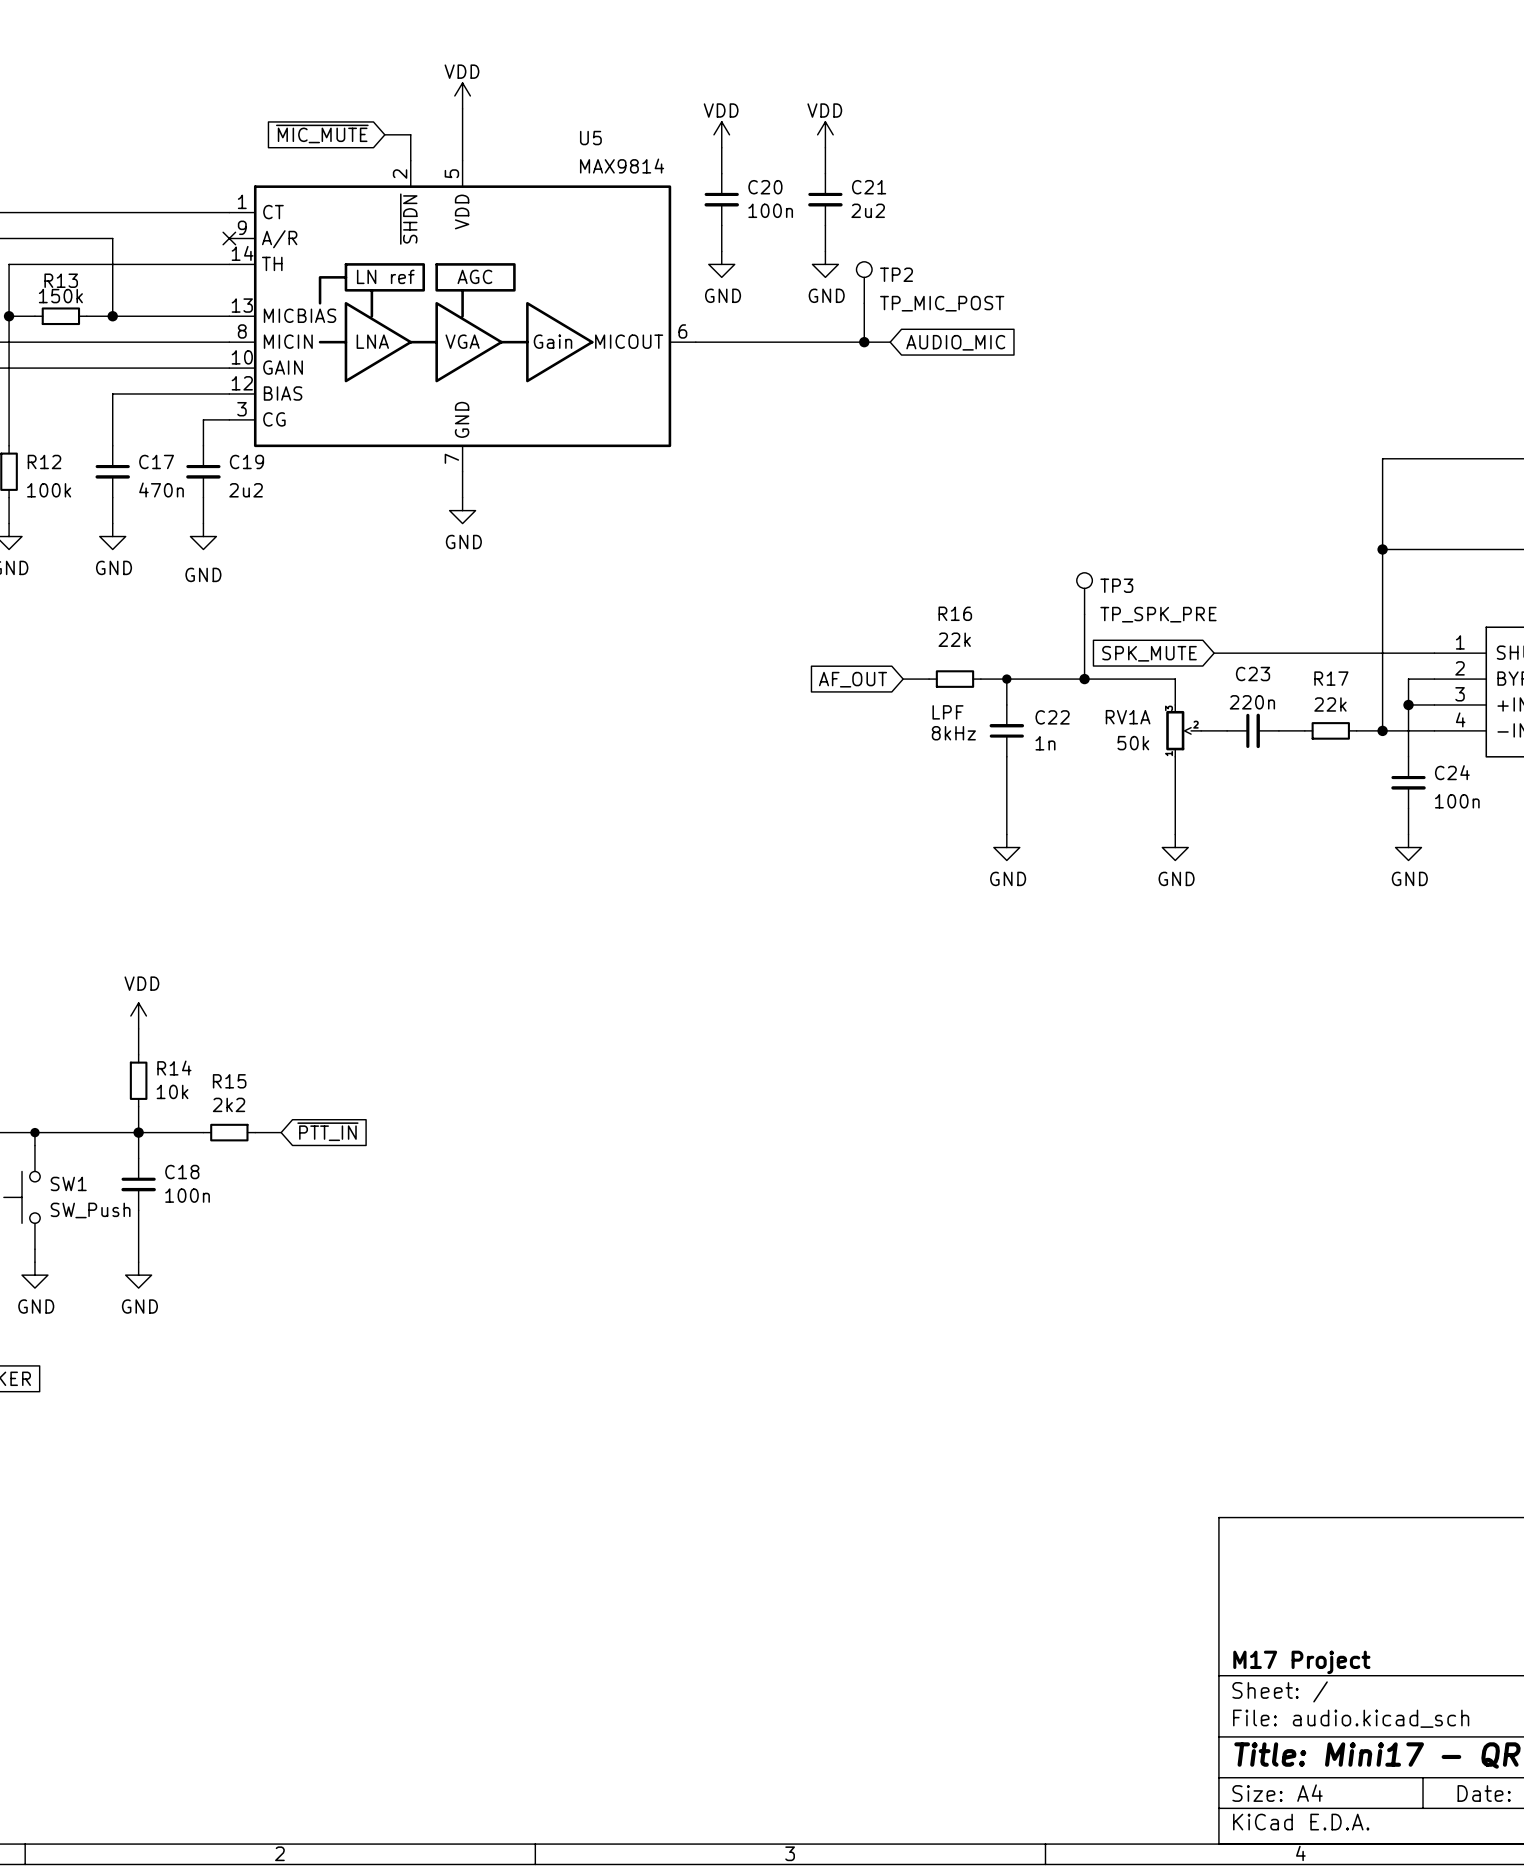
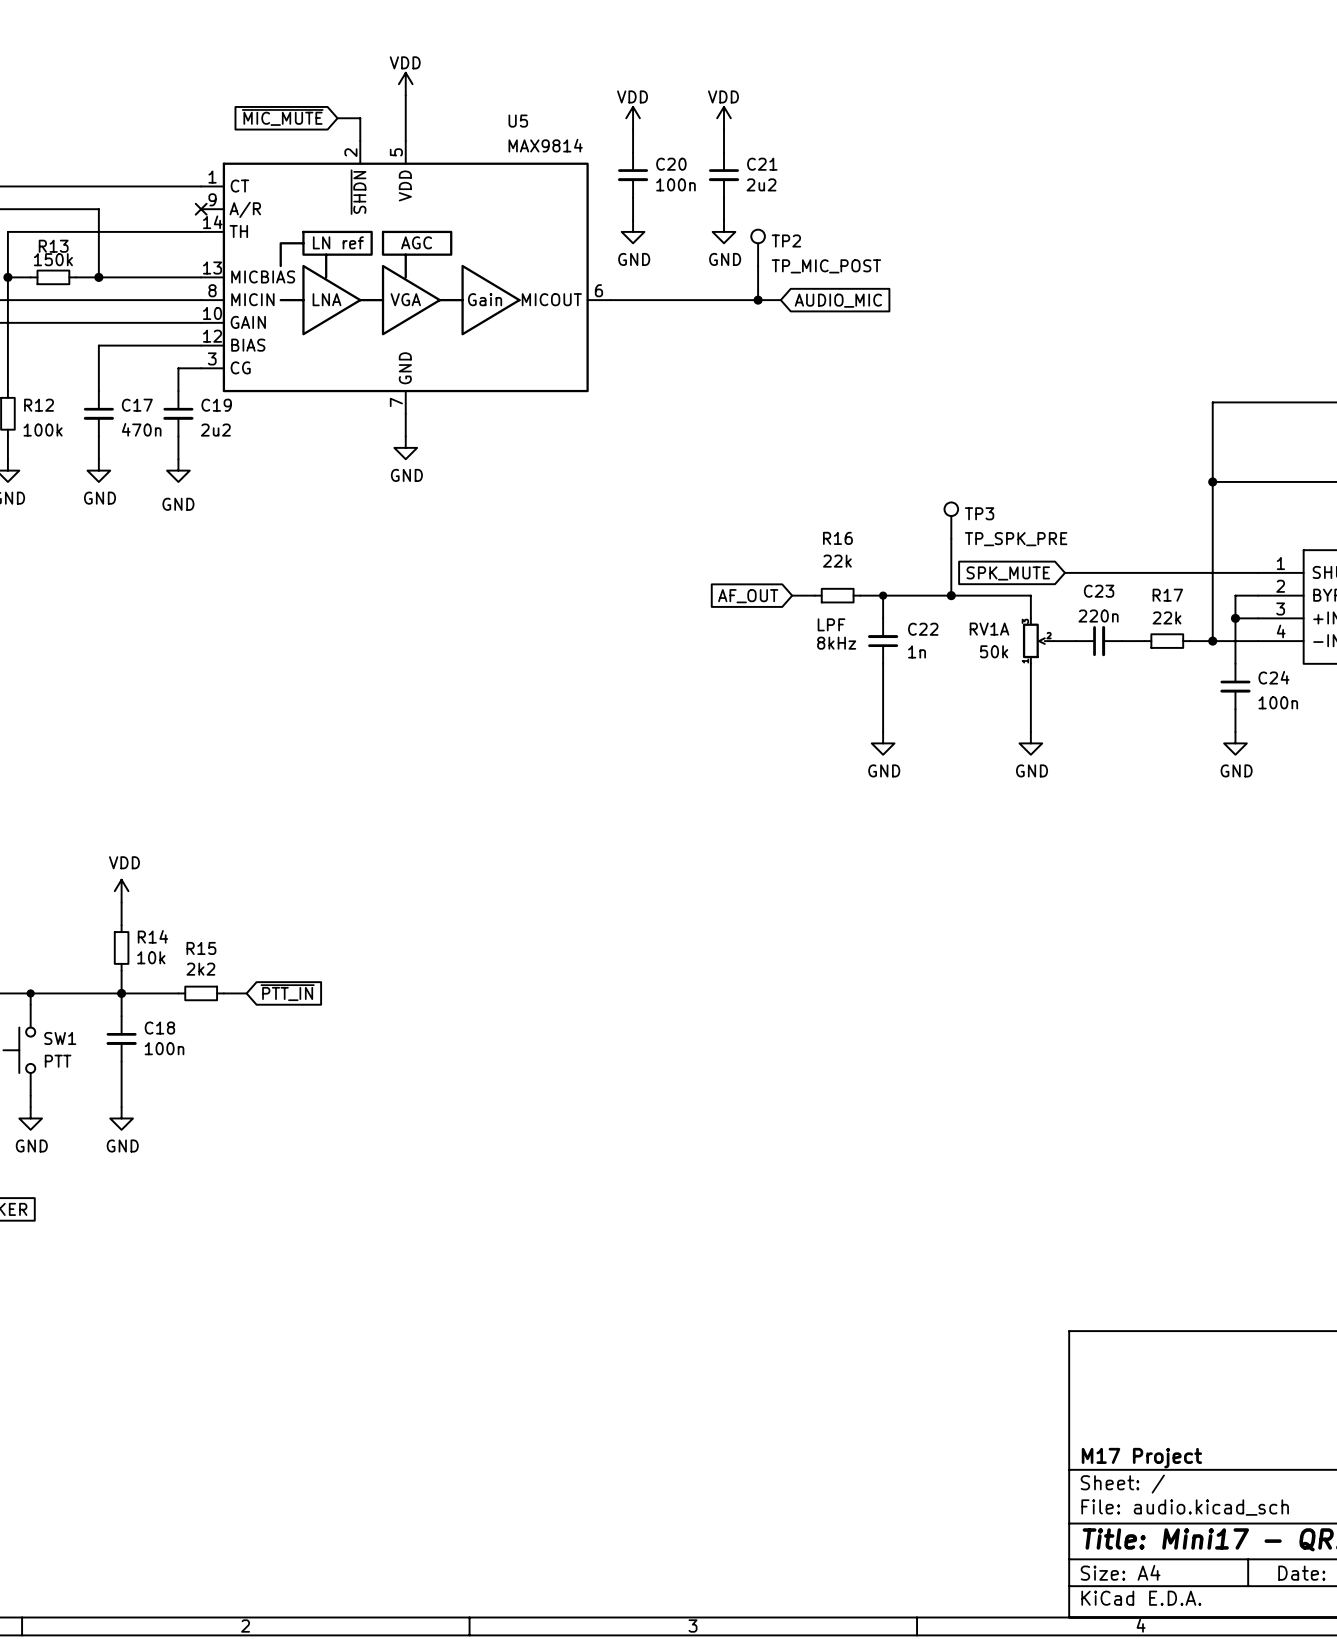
SW1 value: SW_Push (90, 1210) -> PTT (58, 1061)

